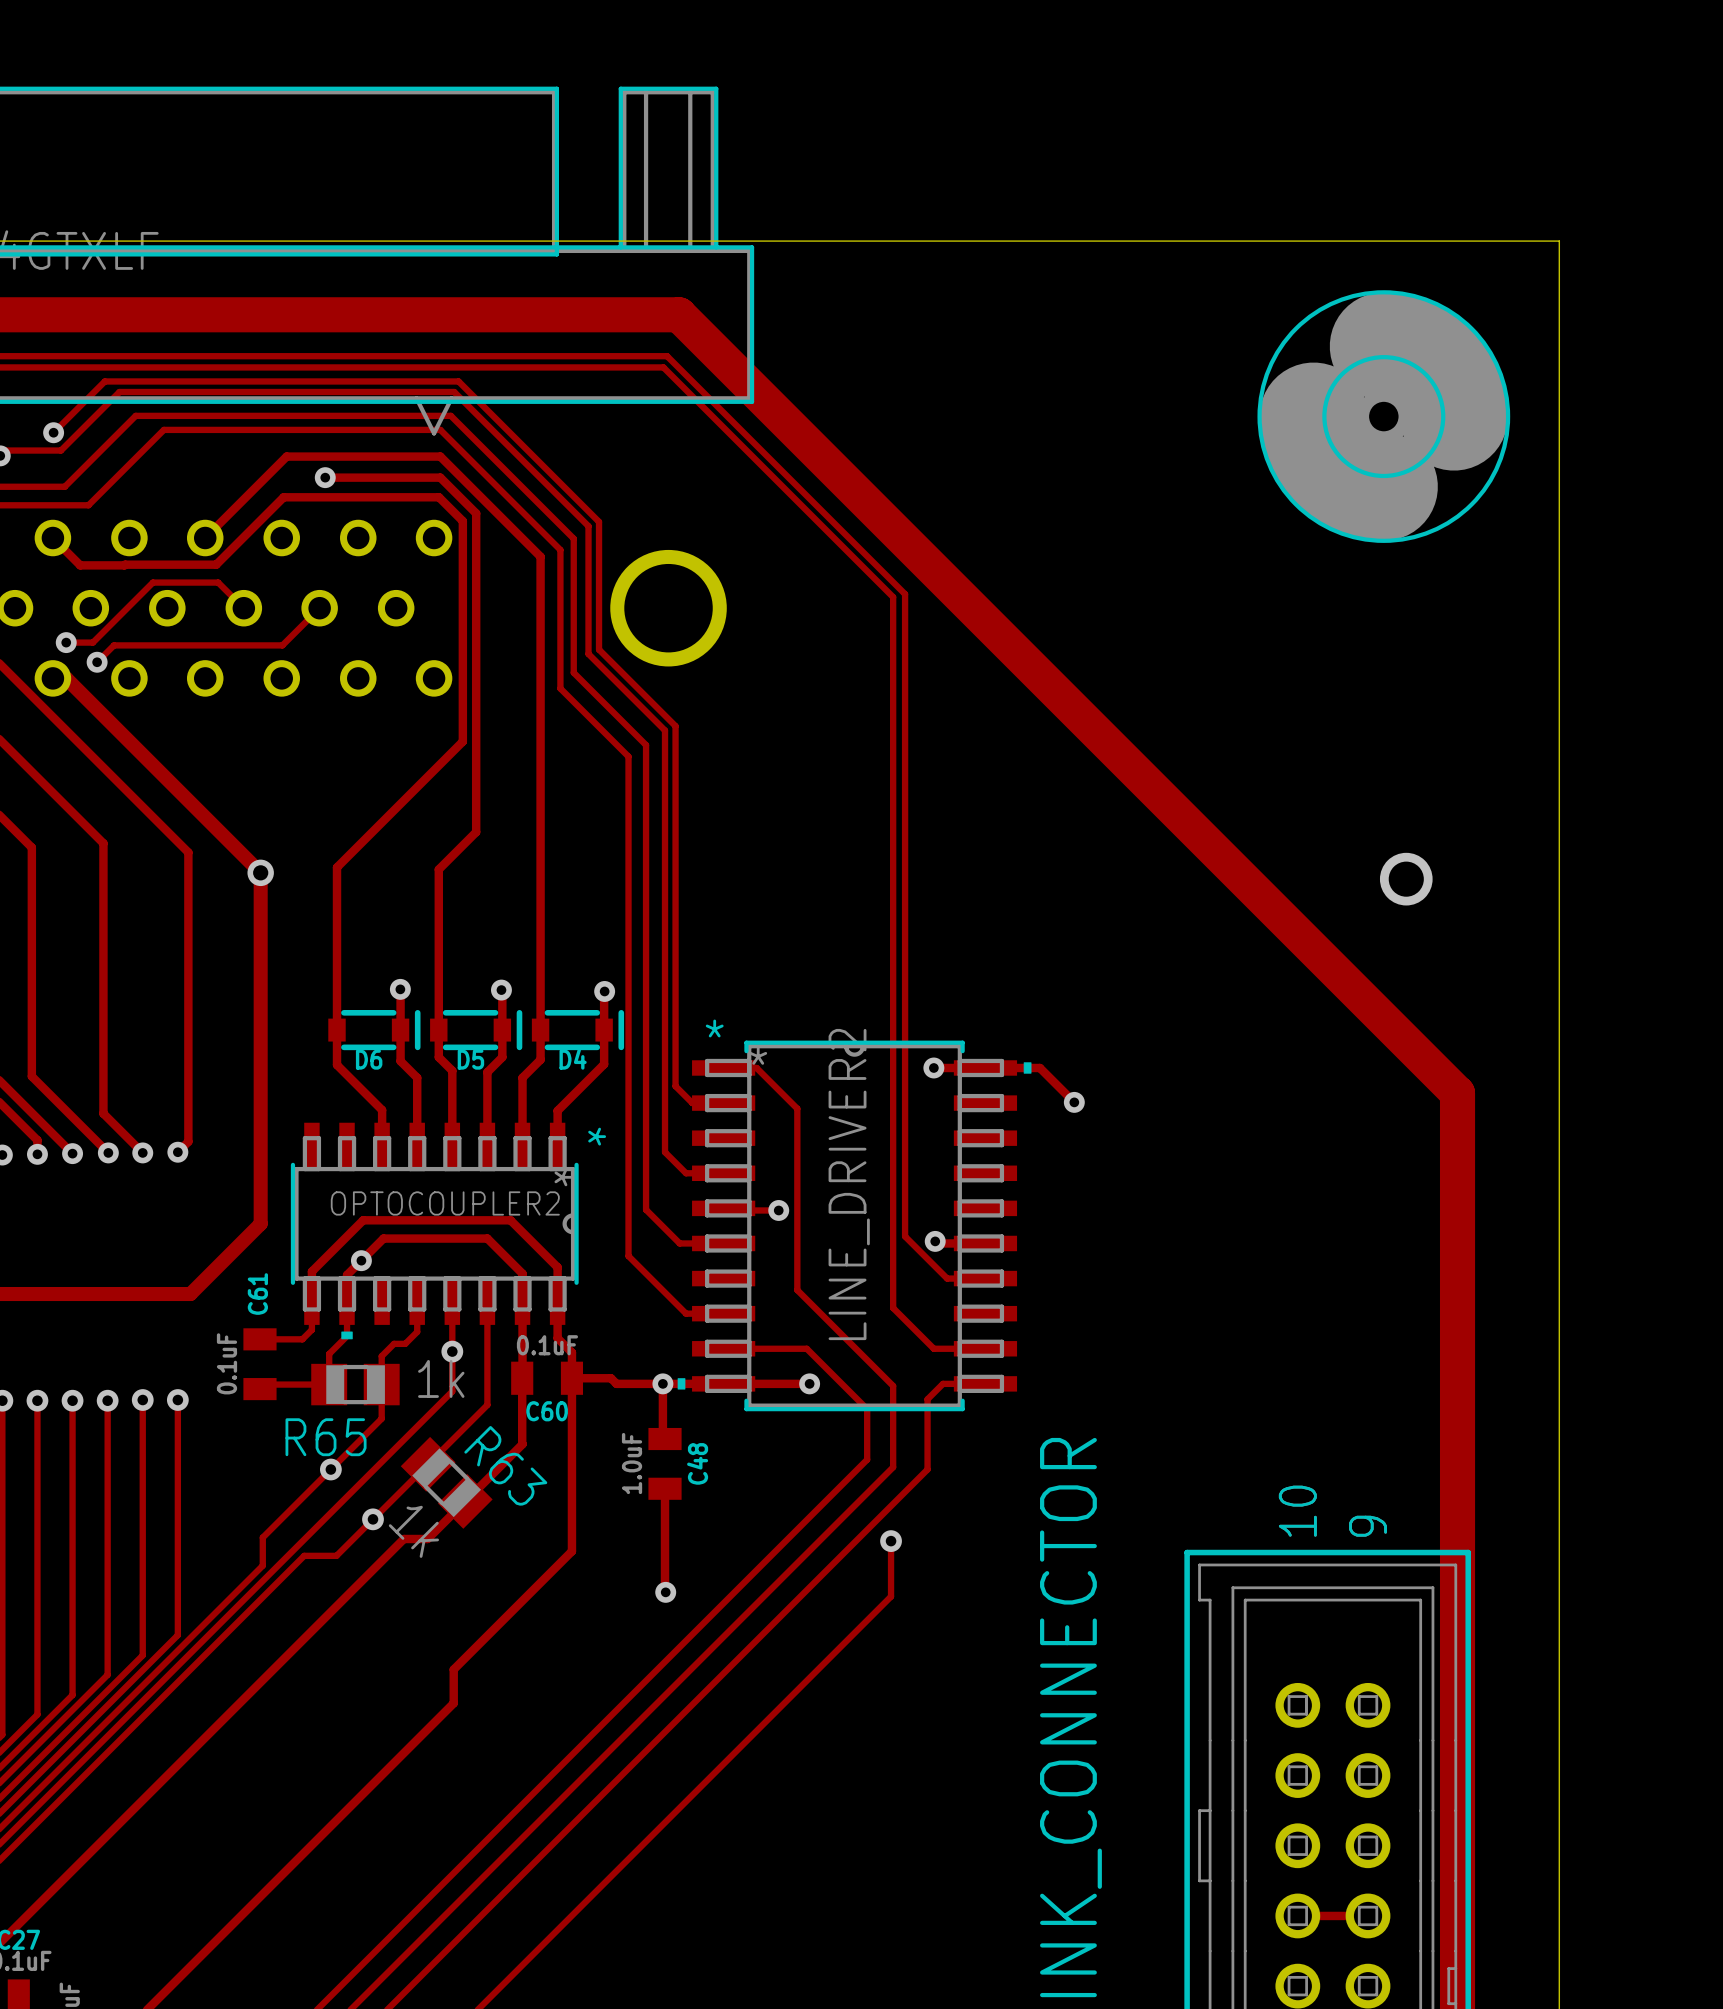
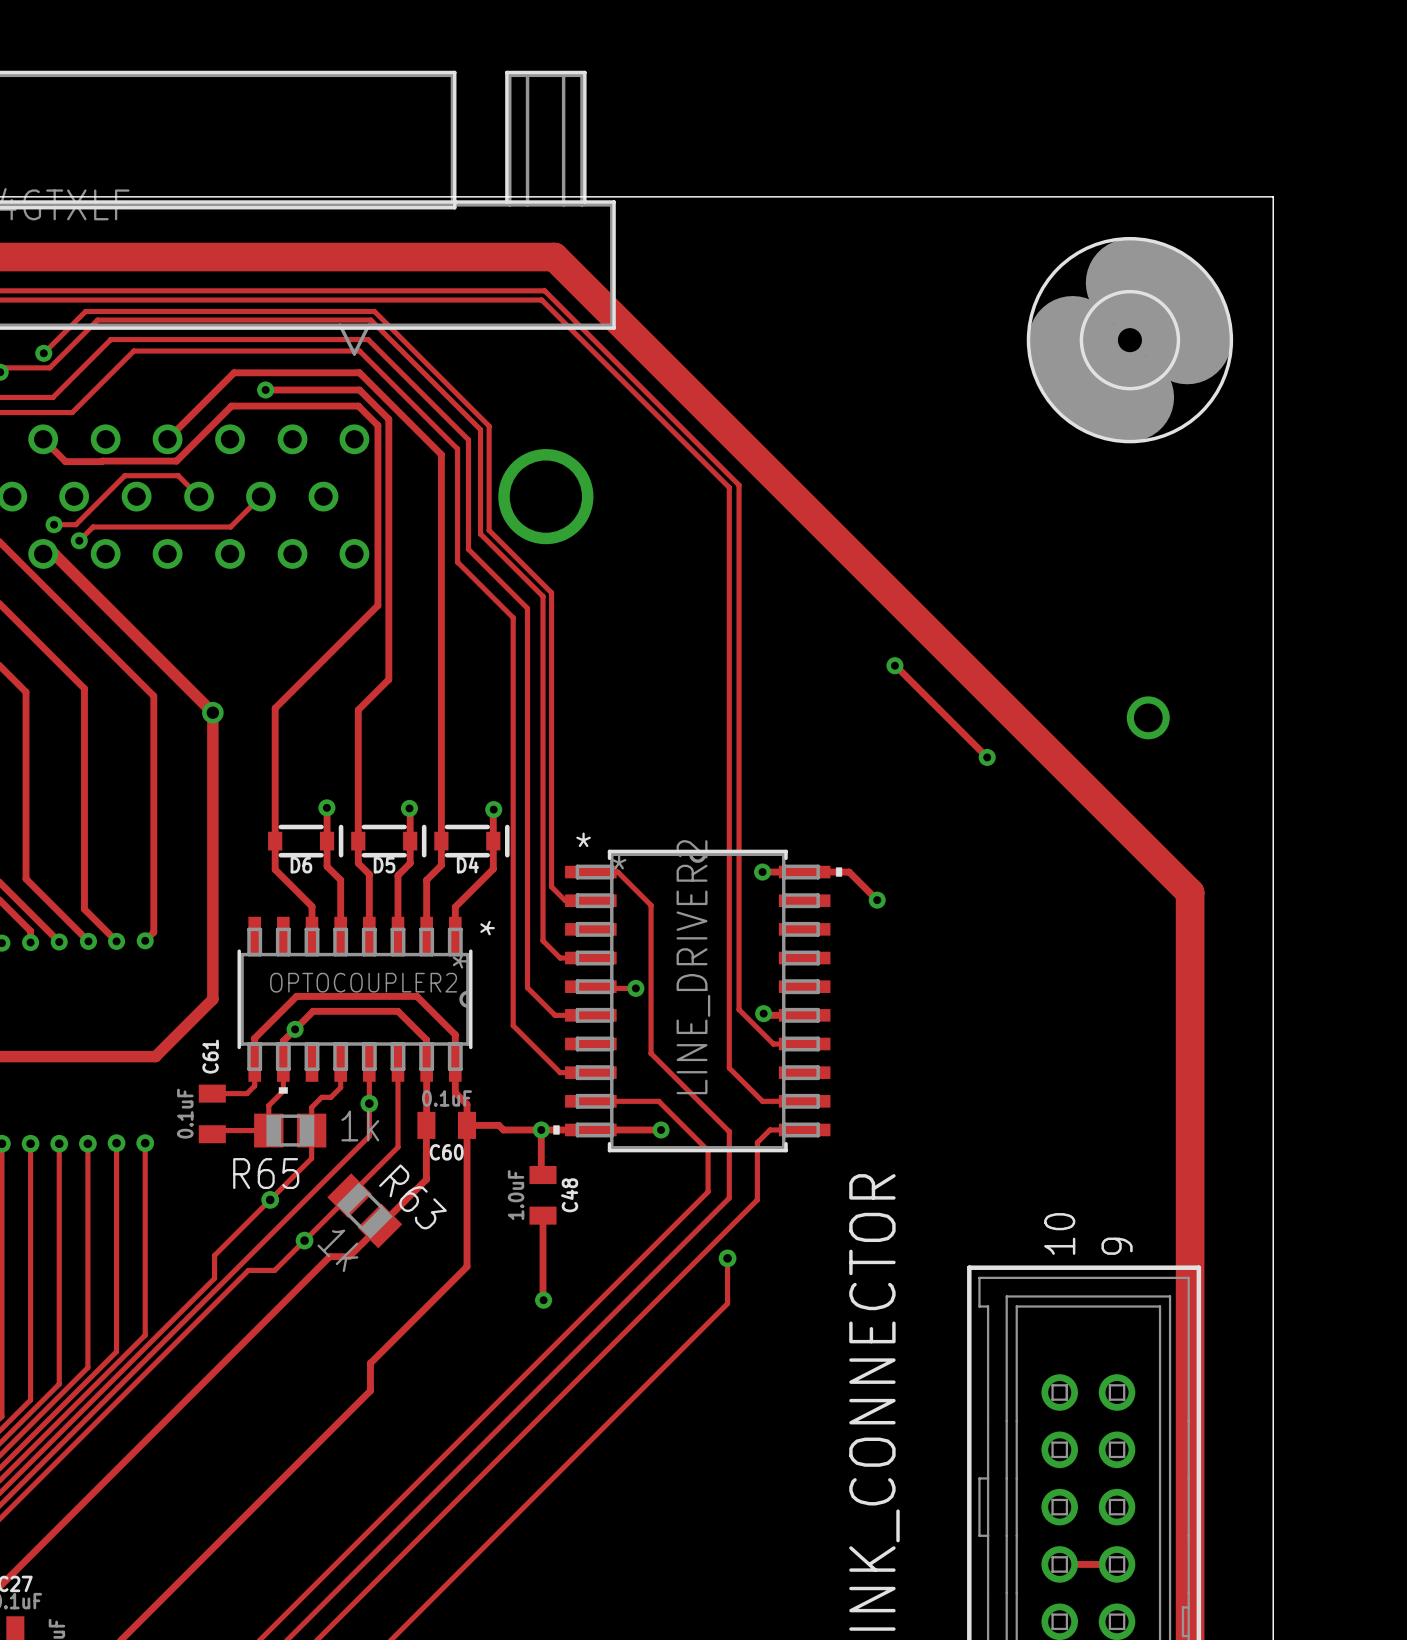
track: none -> (894, 665) (987, 757)
via: none -> (894, 665)
via: none -> (987, 757)

